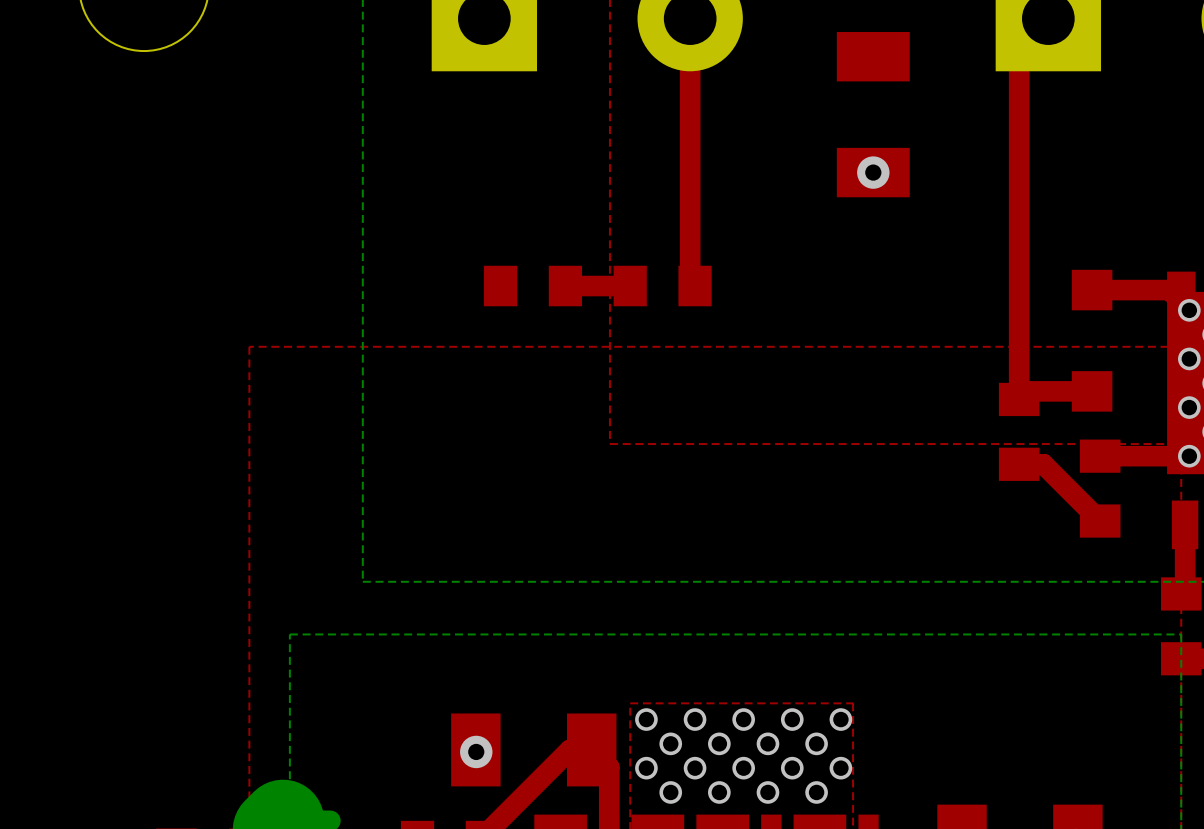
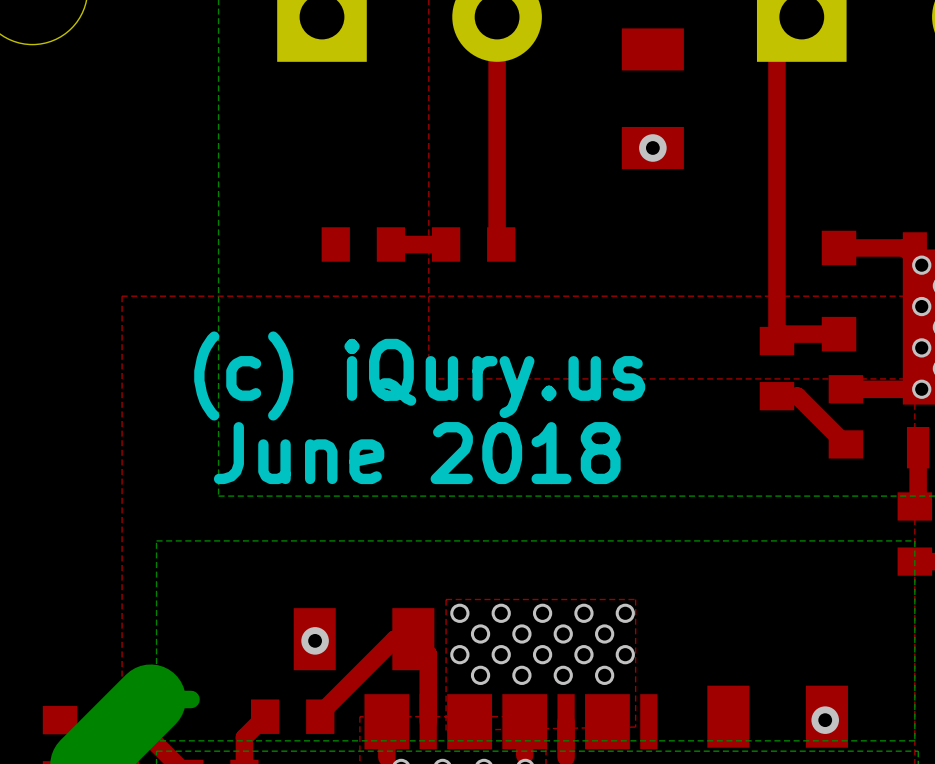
text: none -> (c) iQury.us (419, 375)
text: none -> June 2018 (417, 453)

